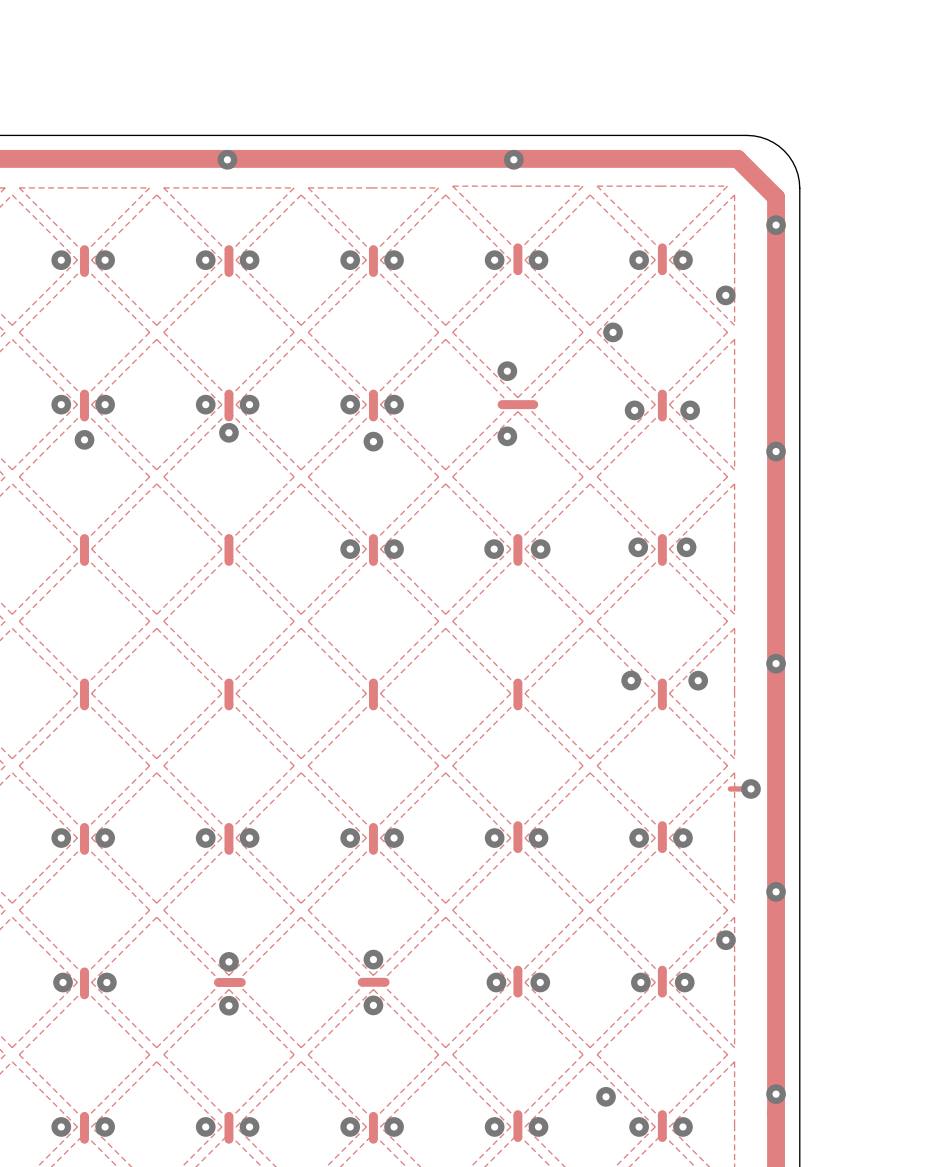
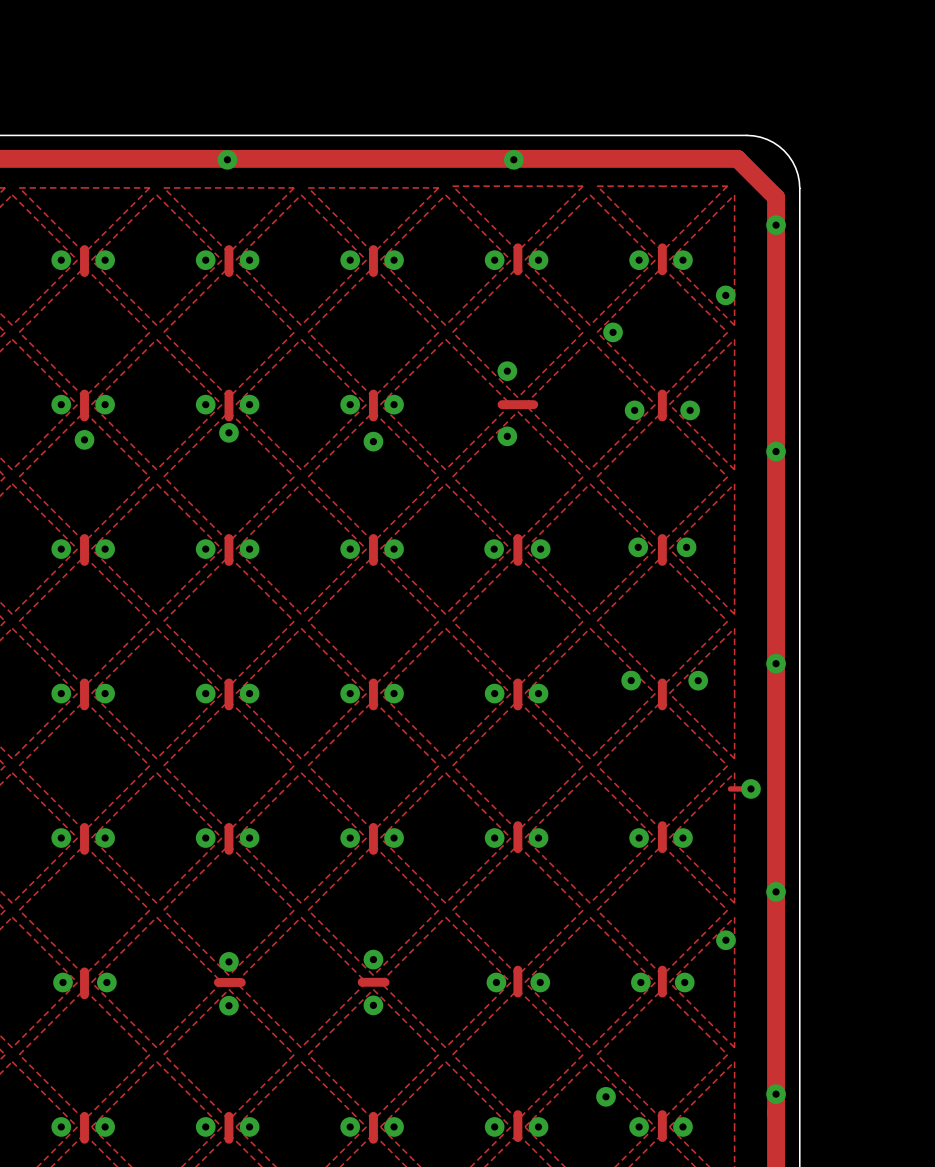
via: none -> (61, 549)
via: none -> (105, 549)
via: none -> (205, 549)
via: none -> (249, 549)
via: none -> (61, 693)
via: none -> (105, 693)
via: none -> (205, 693)
via: none -> (249, 693)
via: none -> (350, 693)
via: none -> (394, 693)
via: none -> (494, 693)
via: none -> (538, 693)

